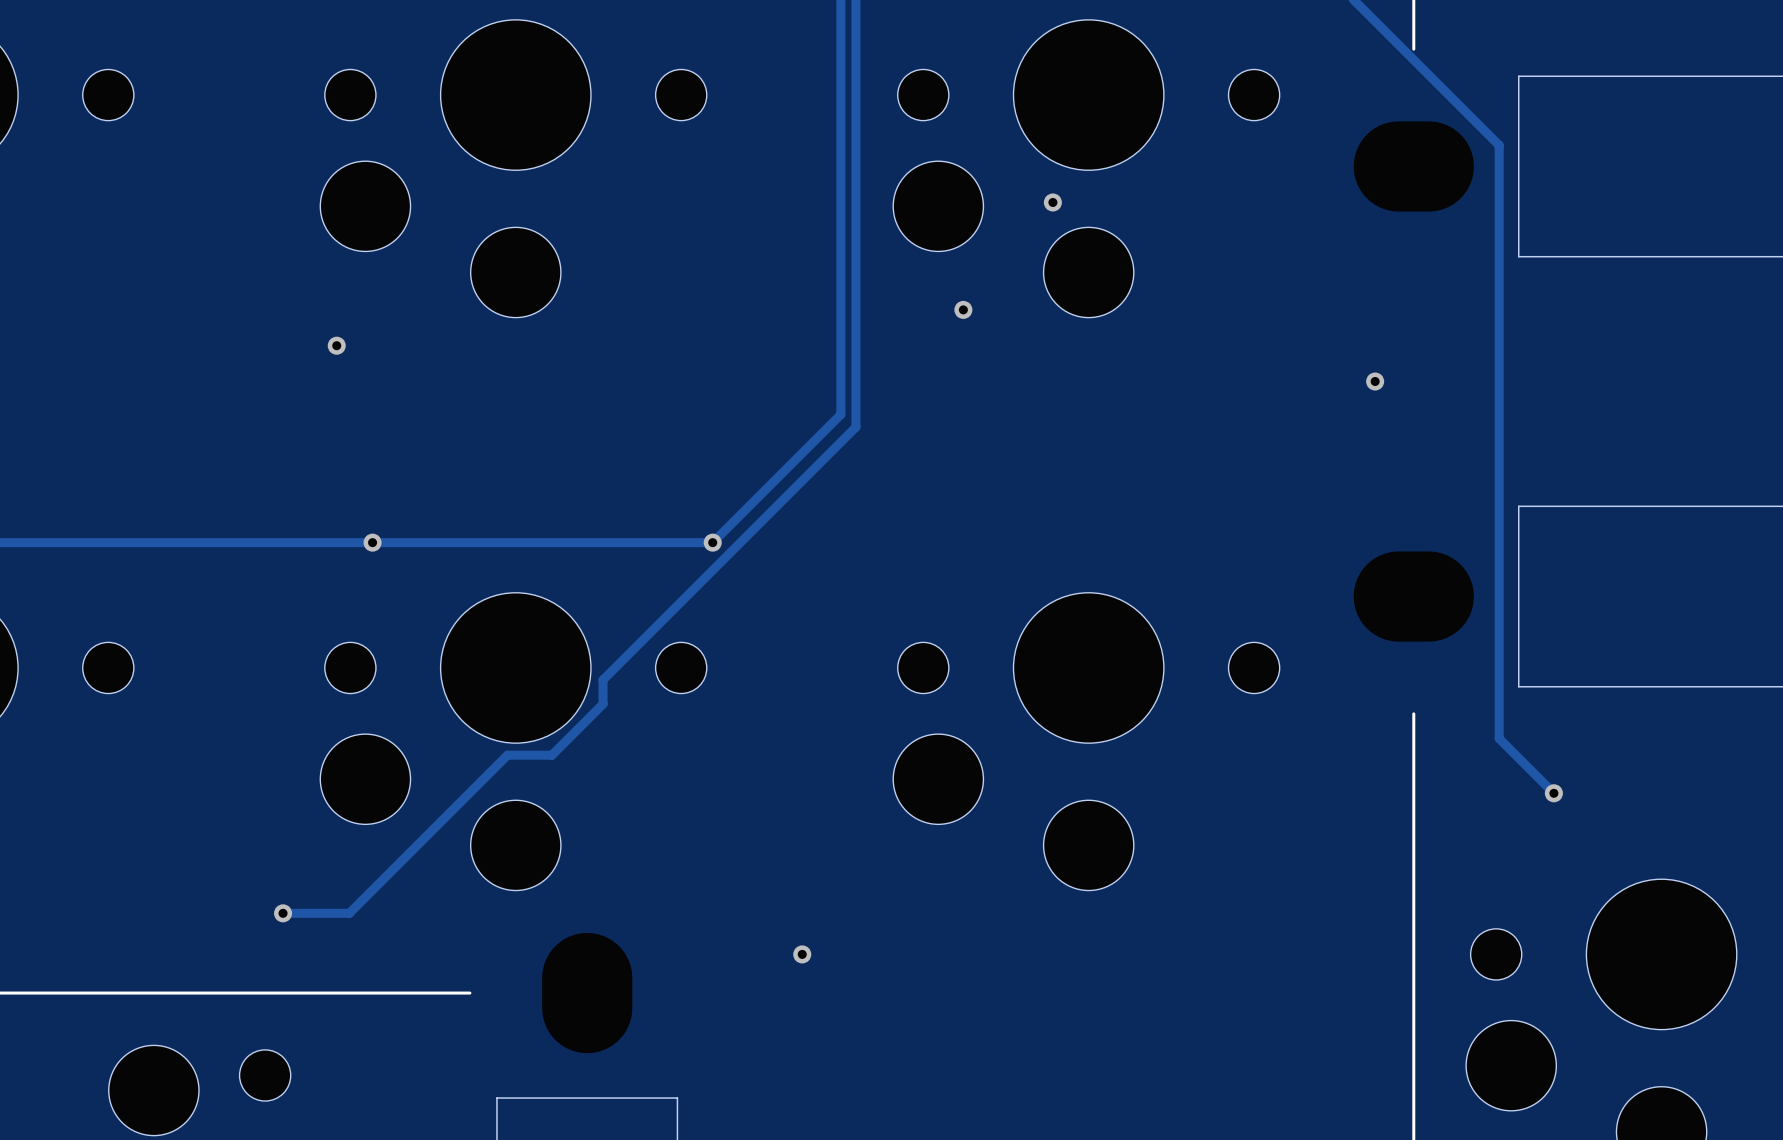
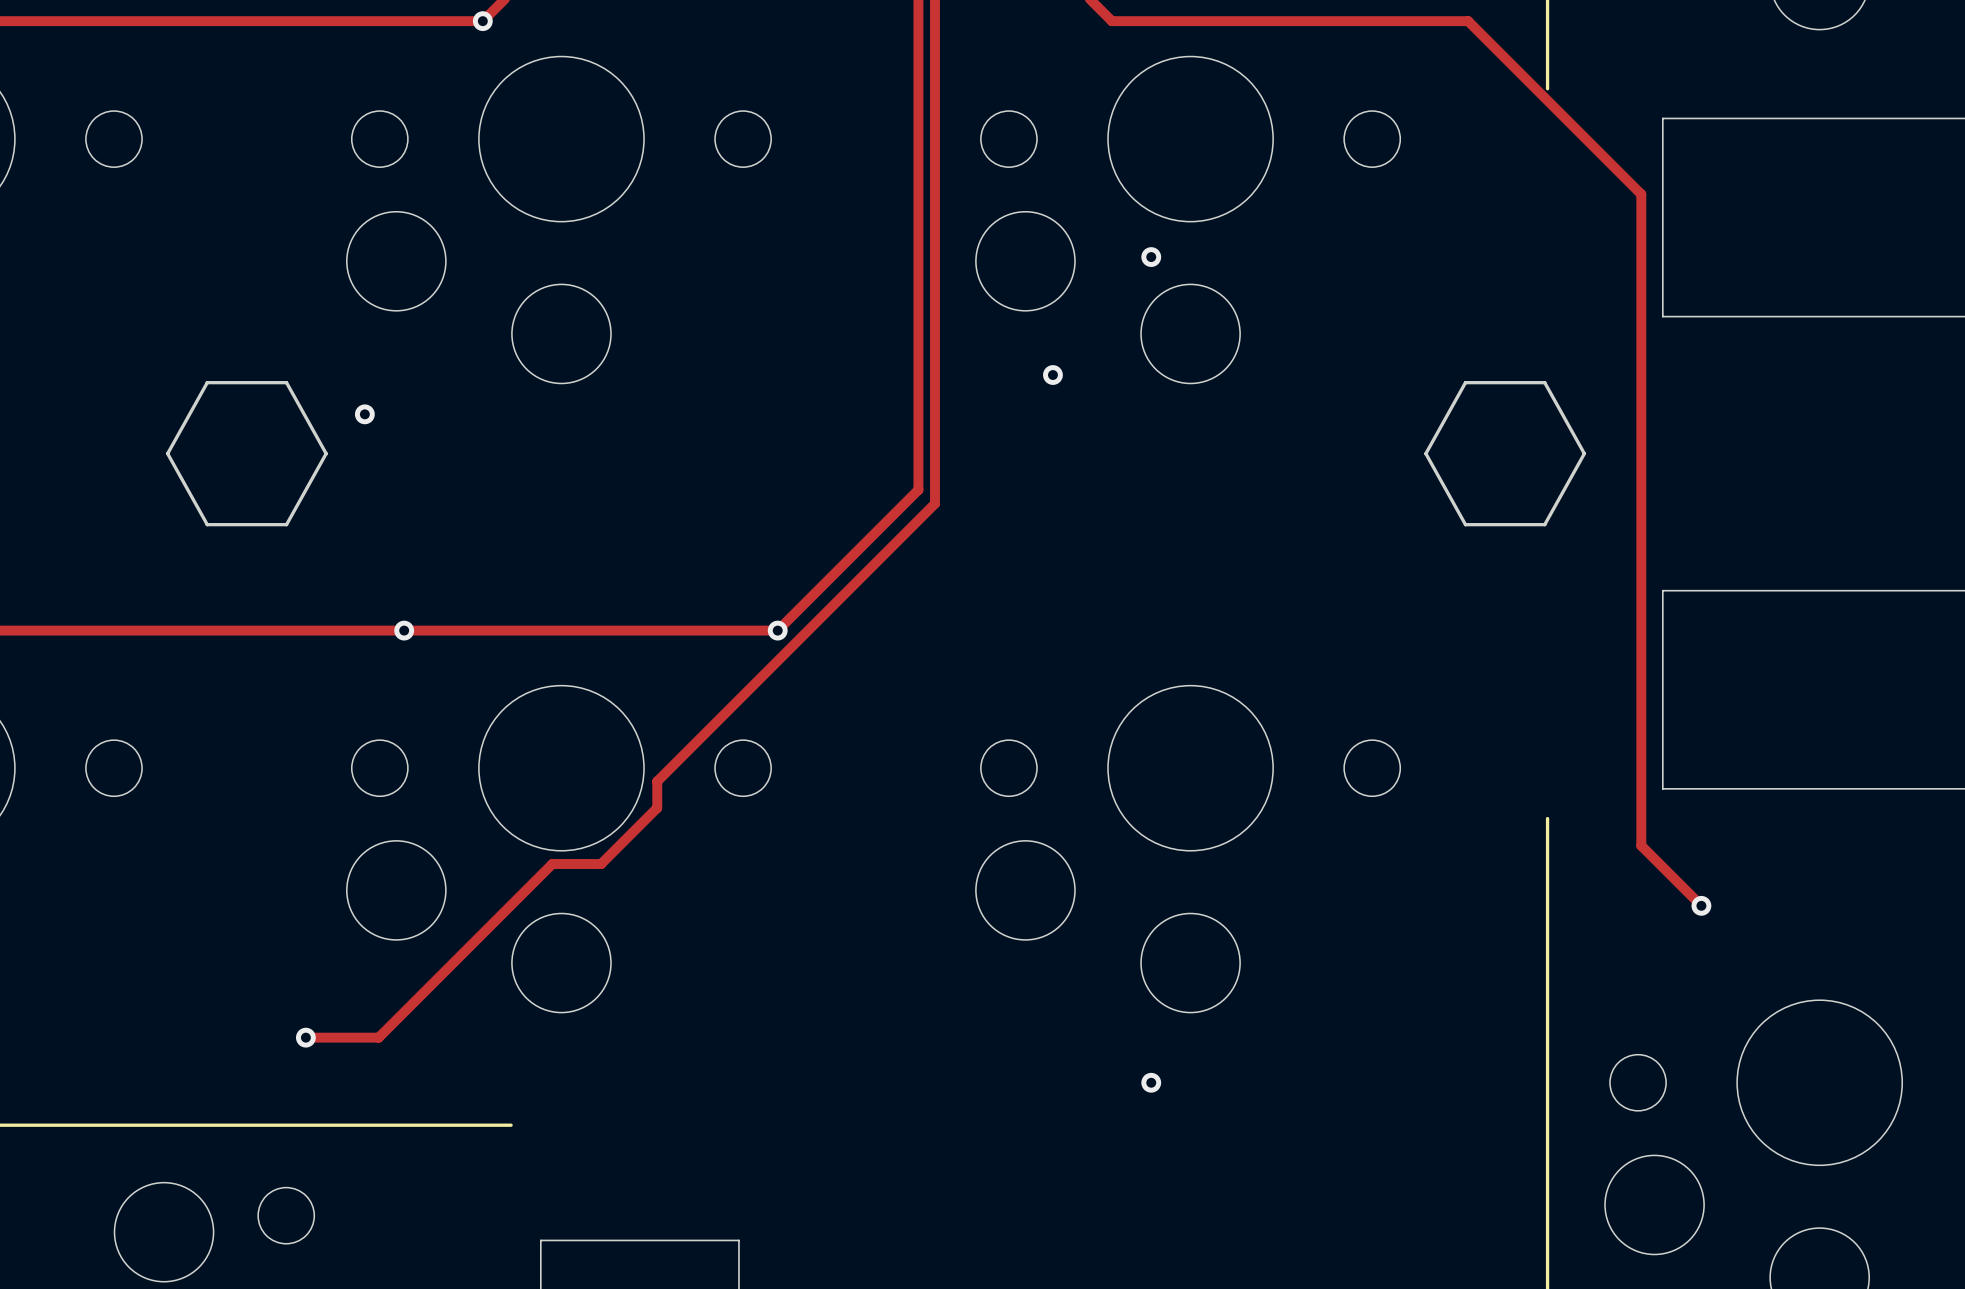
drawing: none -> [166, 381, 328, 527]
drawing: none -> [1424, 381, 1587, 527]
via: (1375, 381) -> none
via: (802, 954) -> none
via: none -> (1151, 1082)

